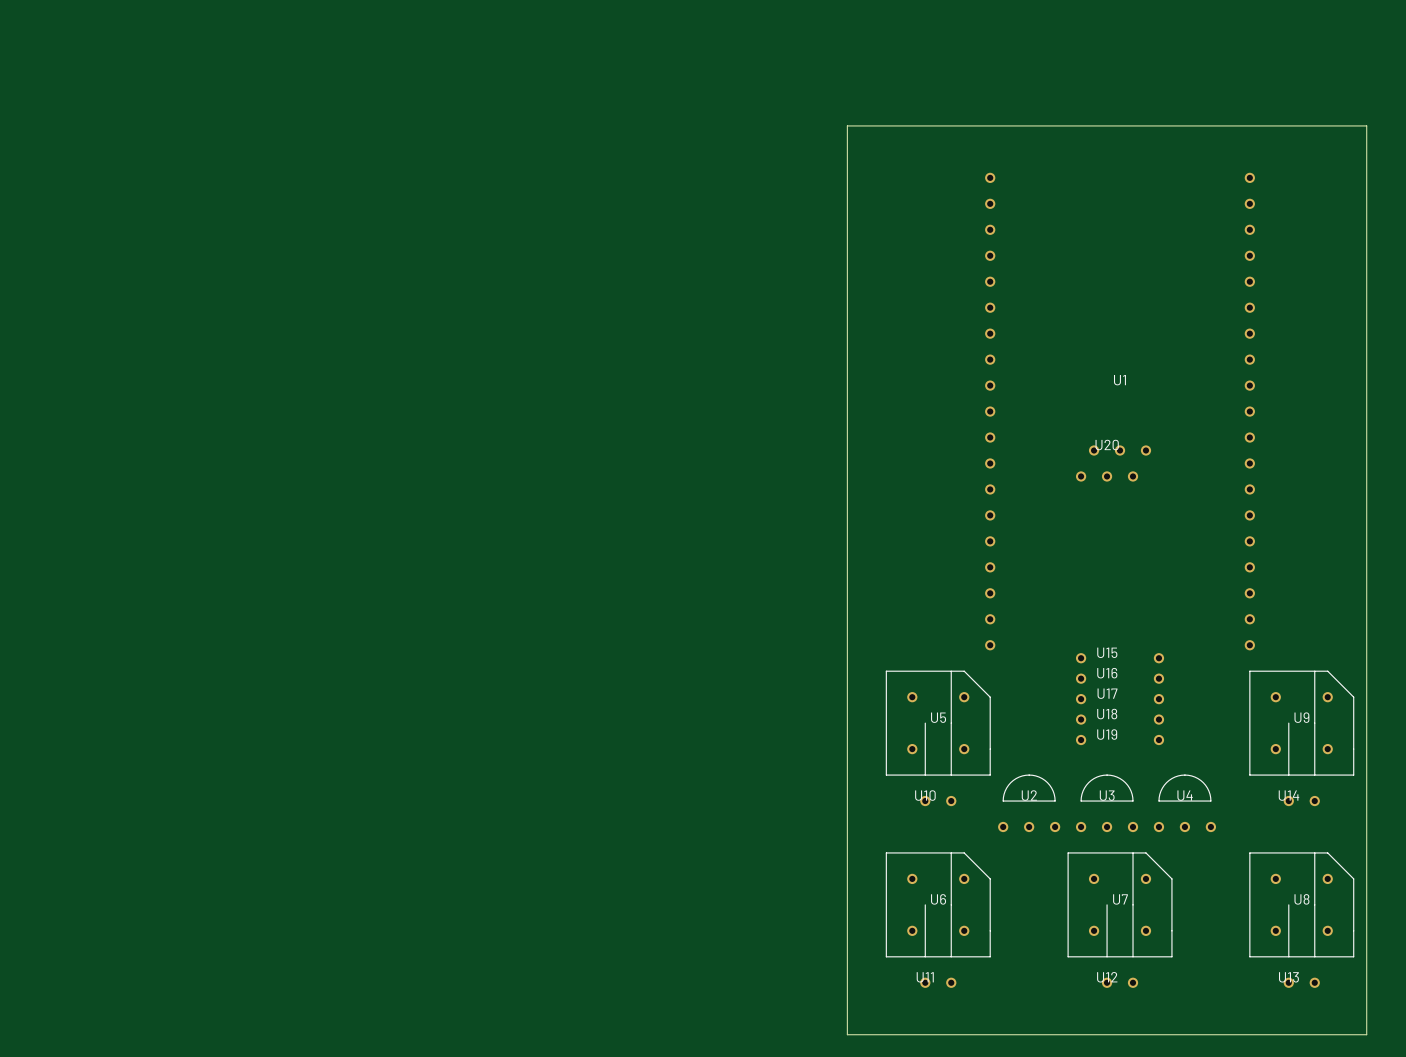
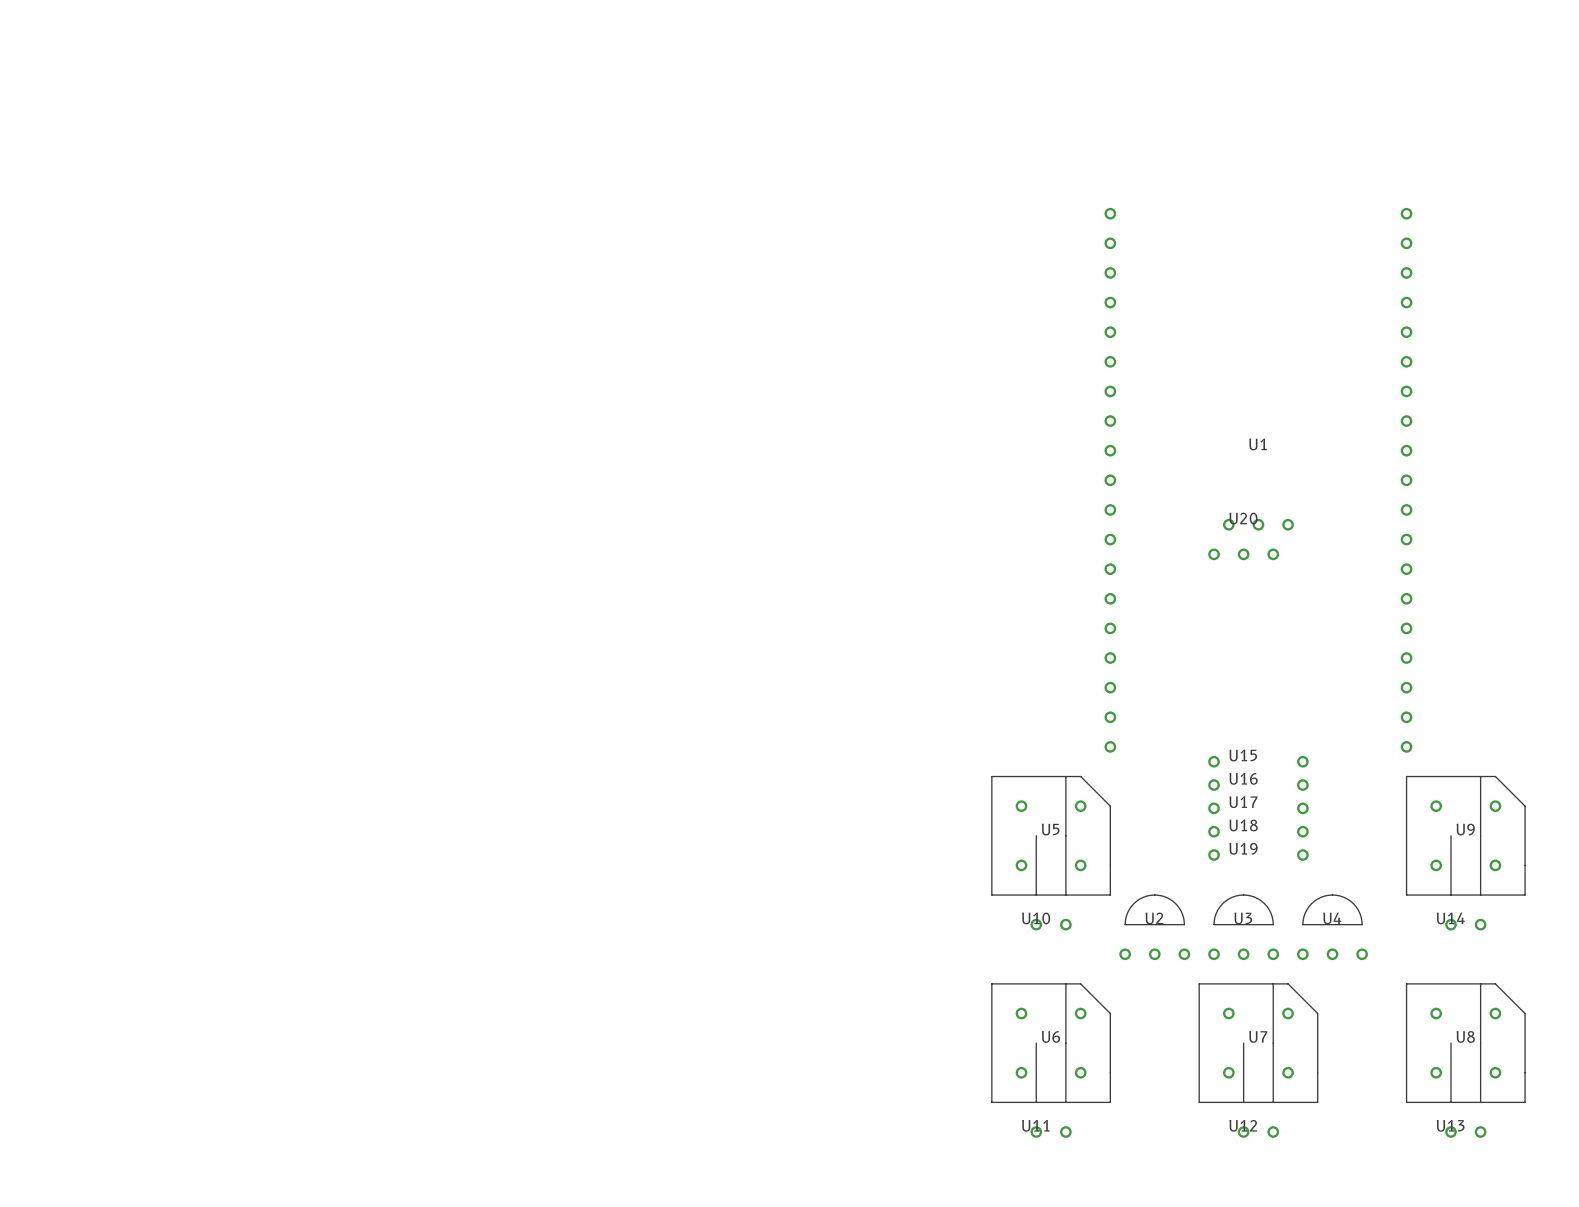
board edge: (847, 125) (1366, 125) (1366, 1034) (847, 1034) (847, 125) -> none

